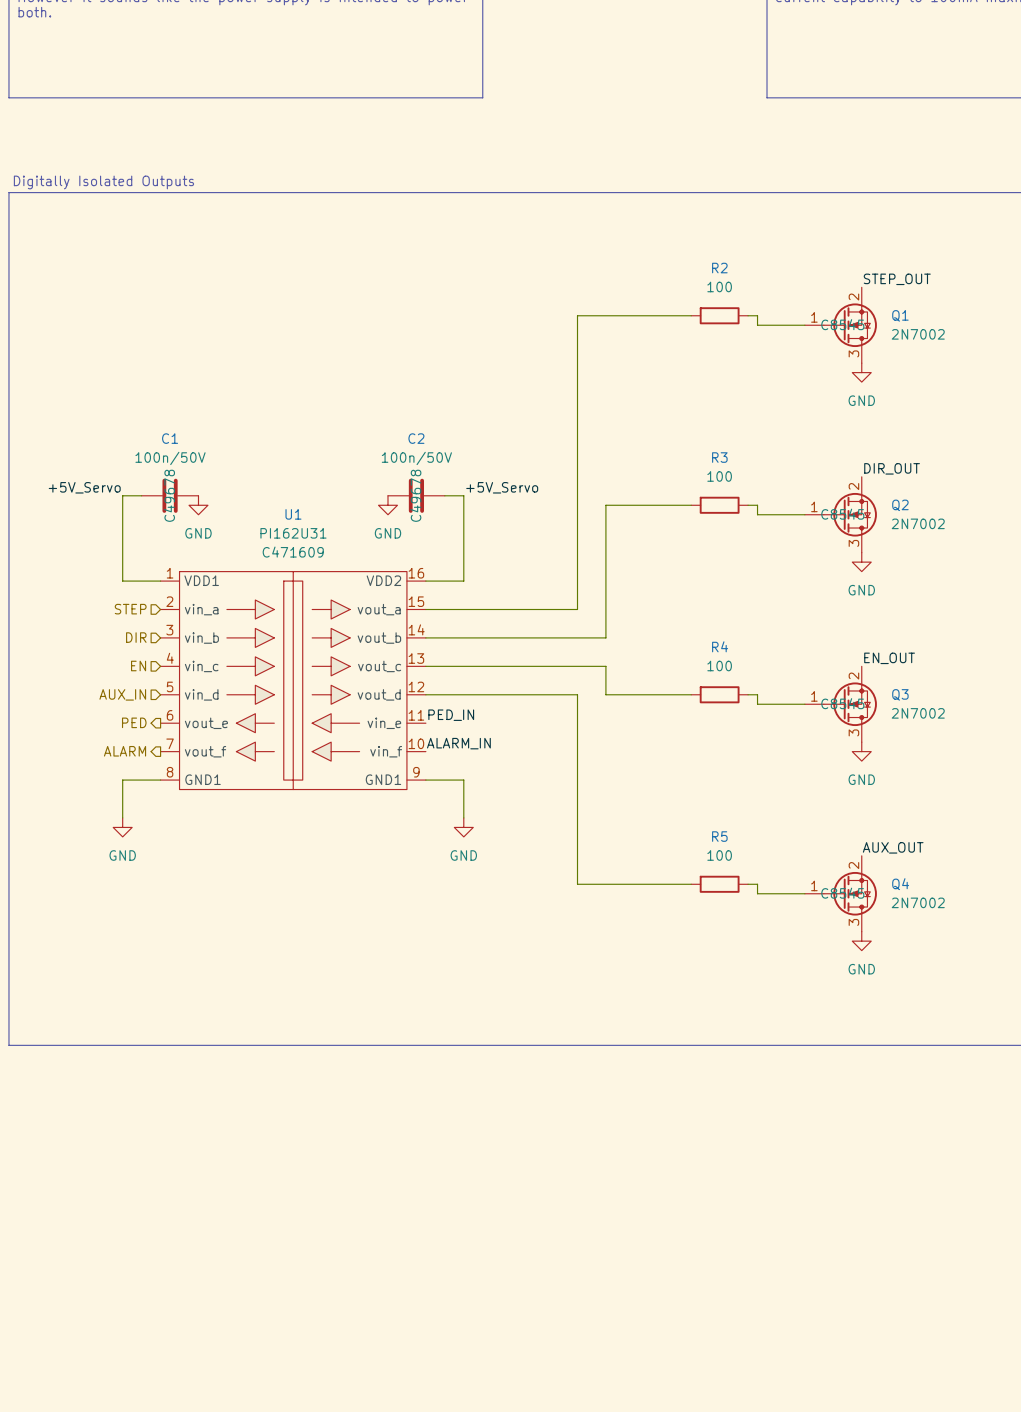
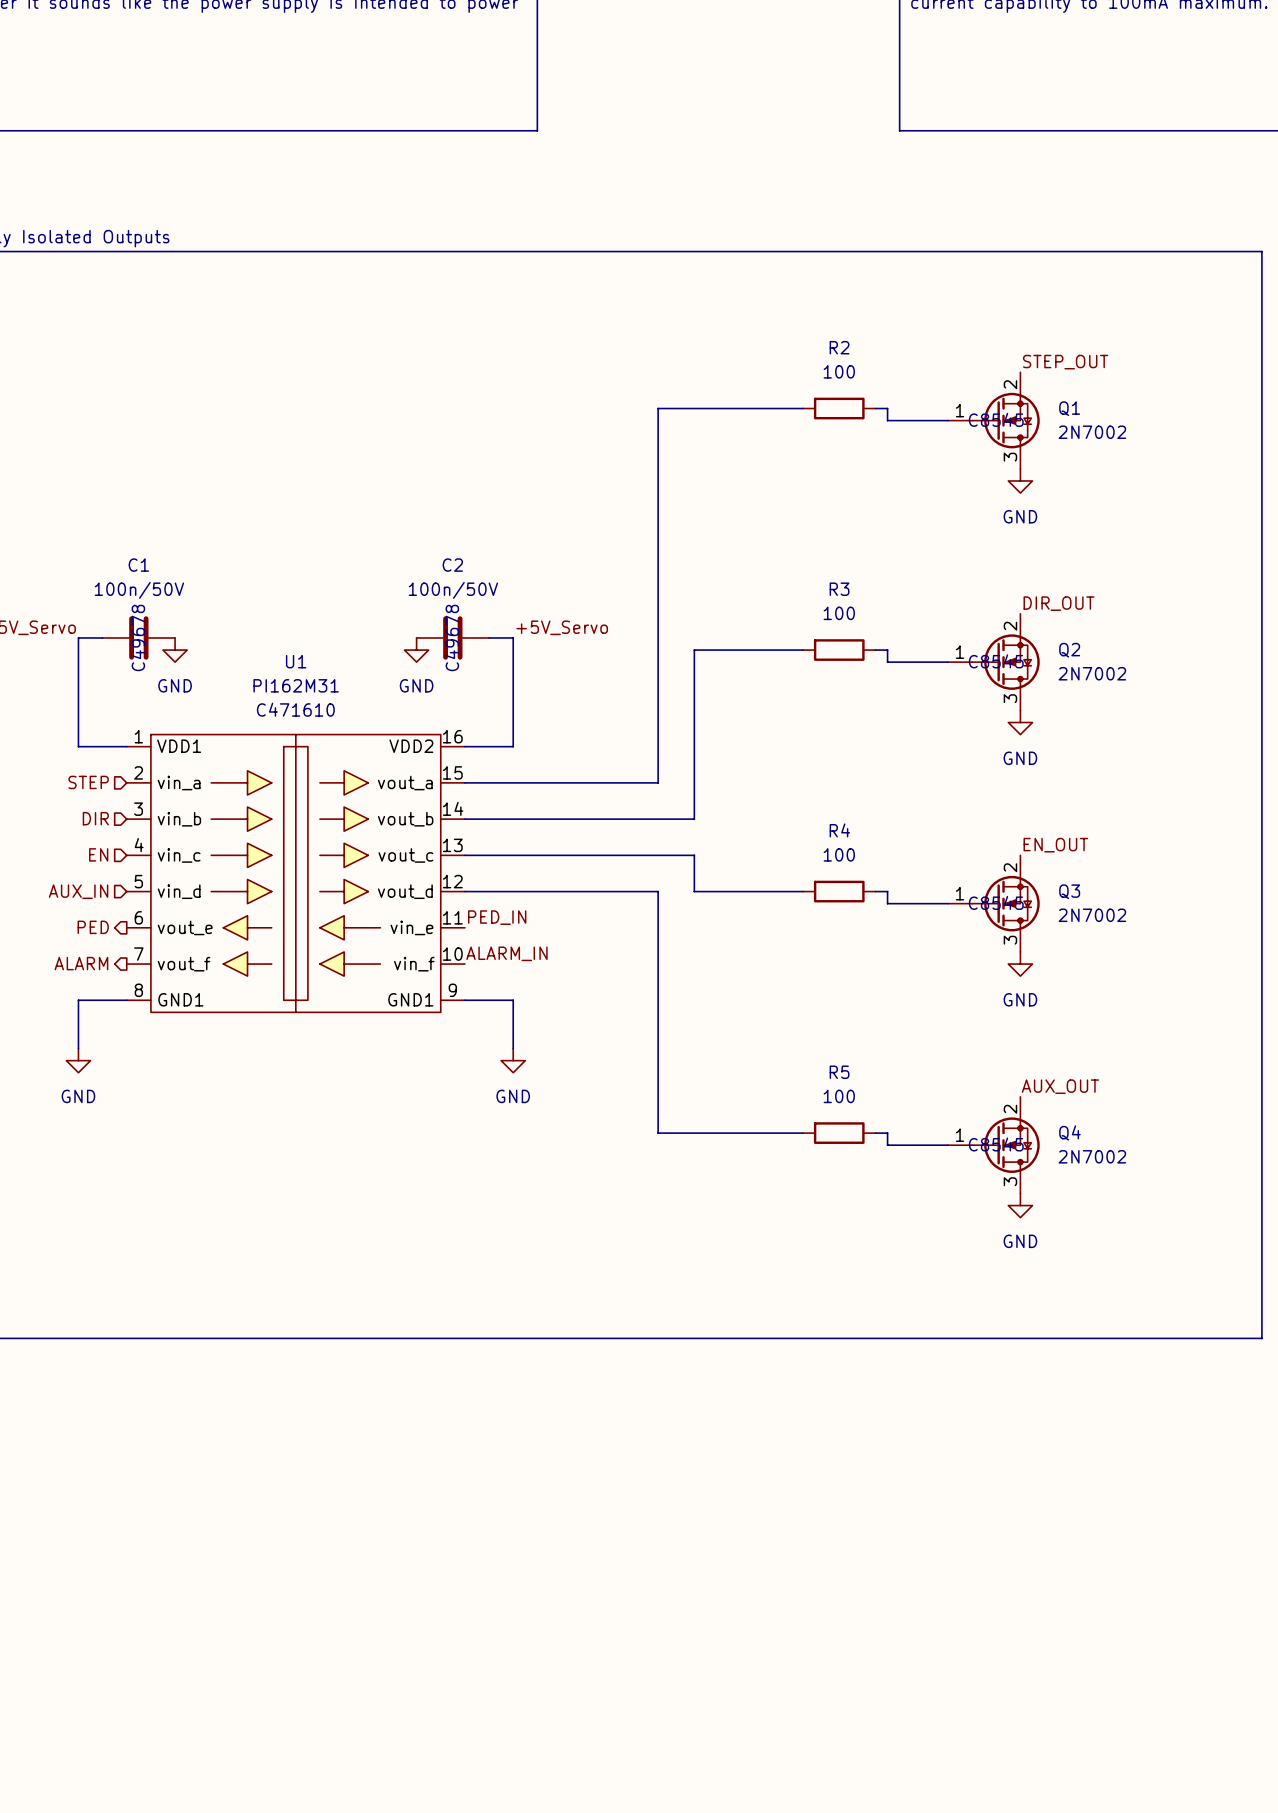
U1 value: PI162U31 (293, 533) -> PI162M31 (296, 685)
U1 text: C471609 (293, 552) -> C471610 (295, 709)

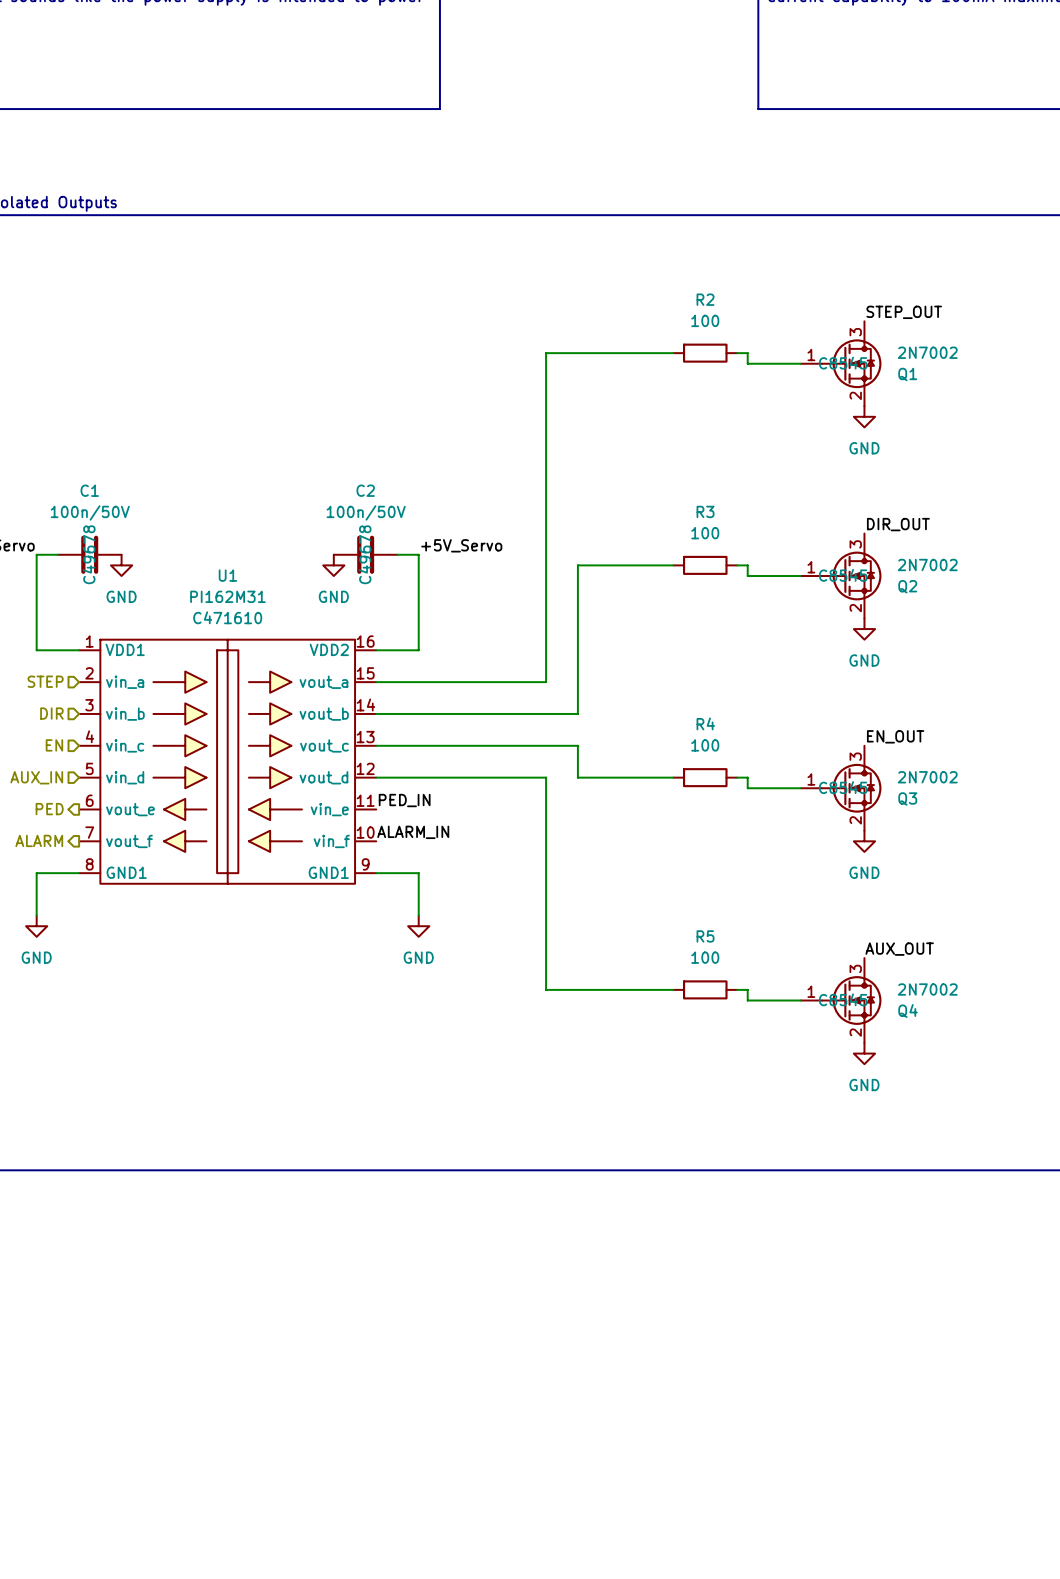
Q1 flip: as is (1005, 420) -> up-down (851, 363)
Q2 flip: as is (1005, 662) -> up-down (851, 576)
Q3 flip: as is (1005, 903) -> up-down (851, 788)
Q4 flip: as is (1005, 1145) -> up-down (851, 1000)

